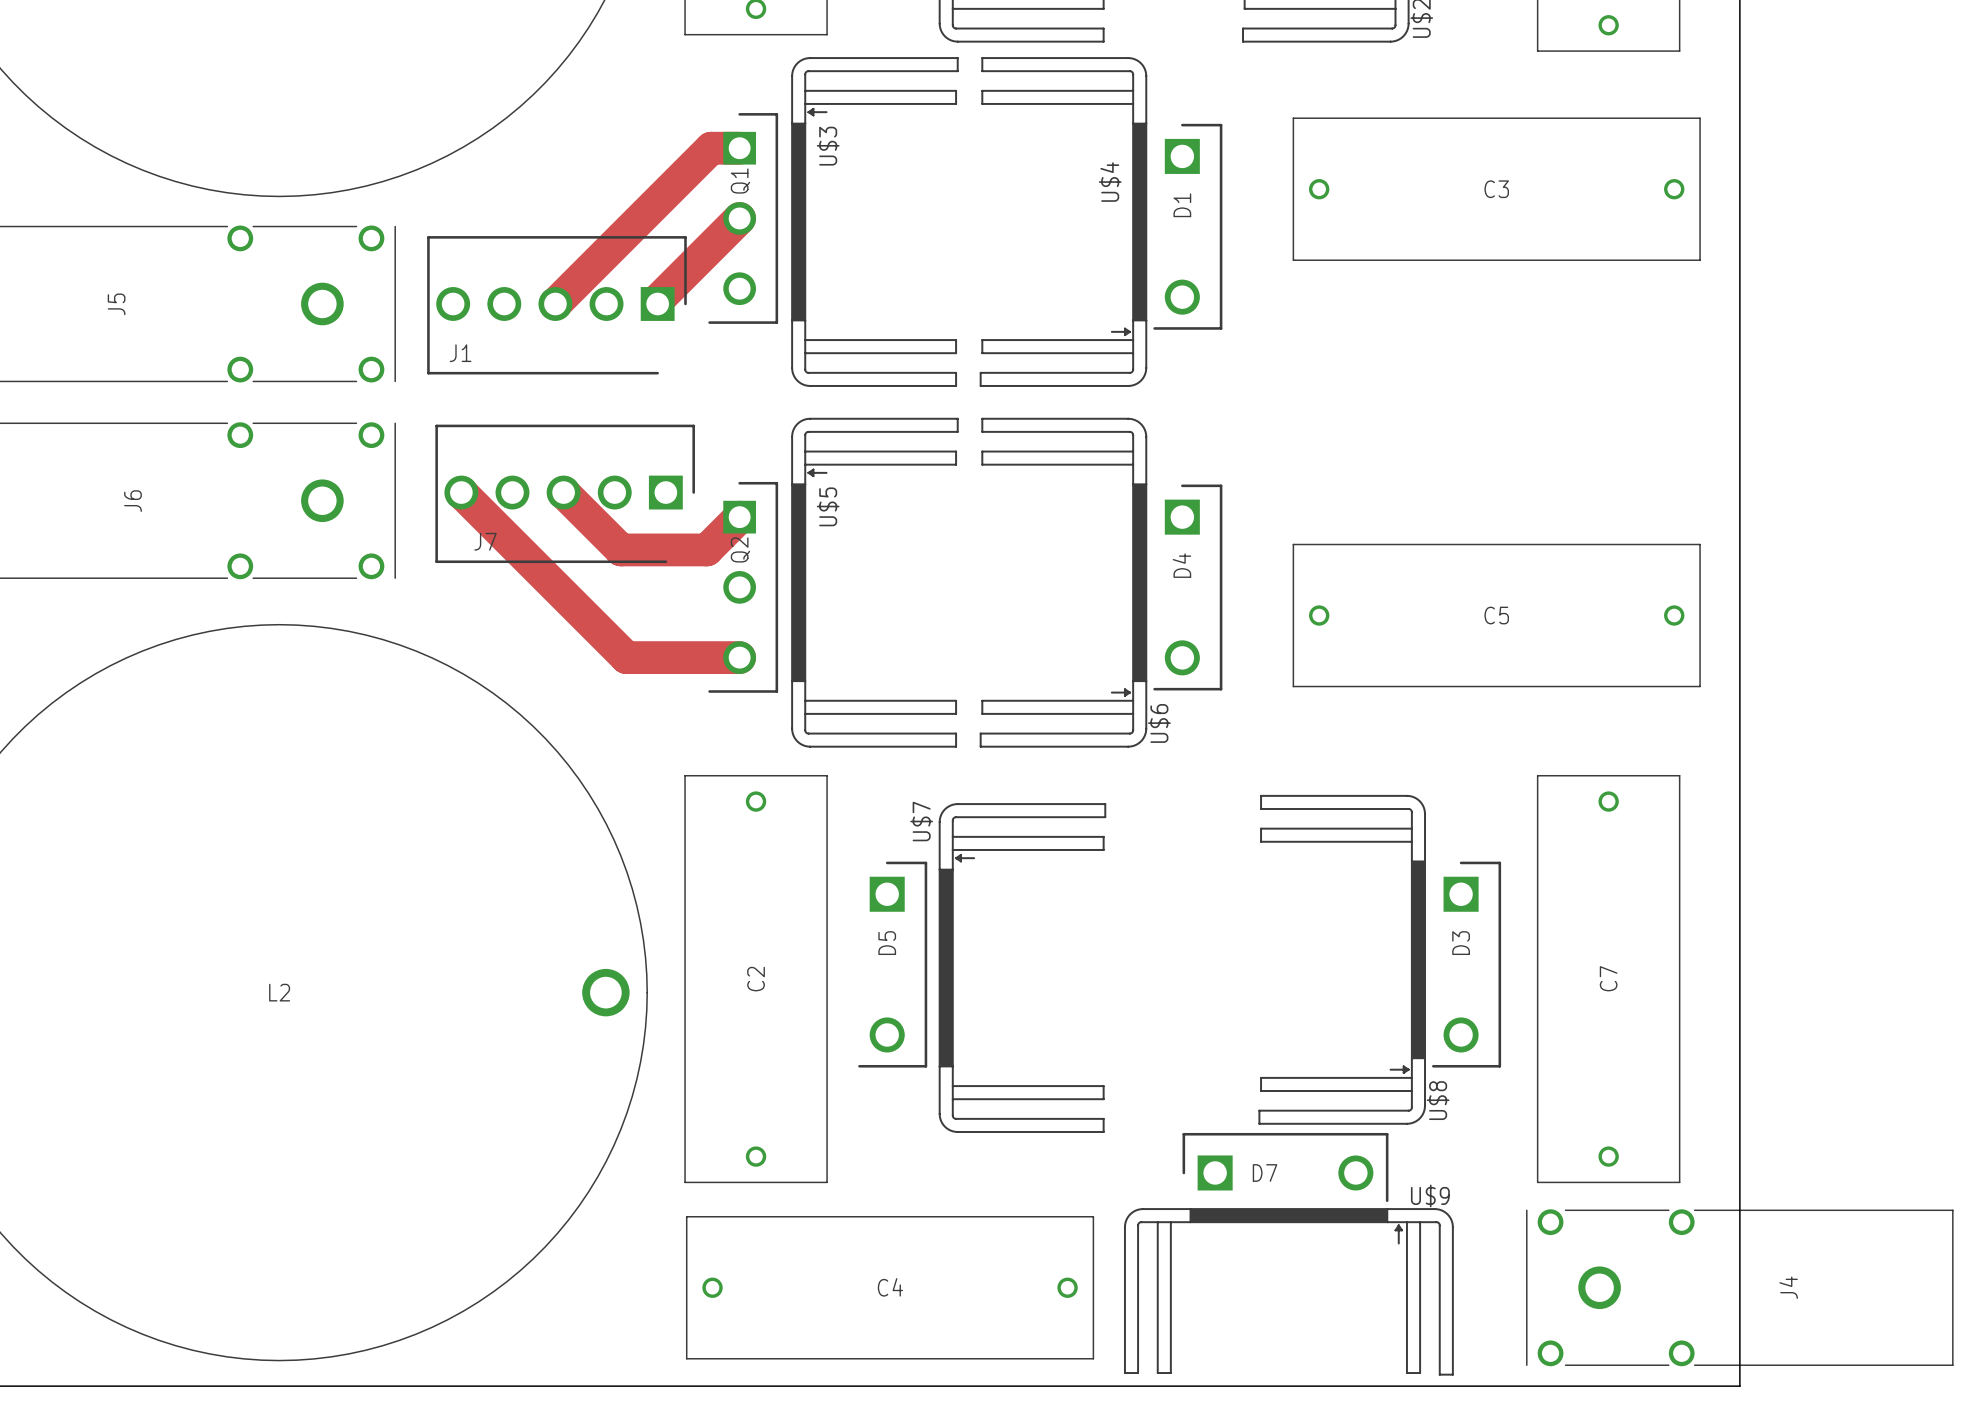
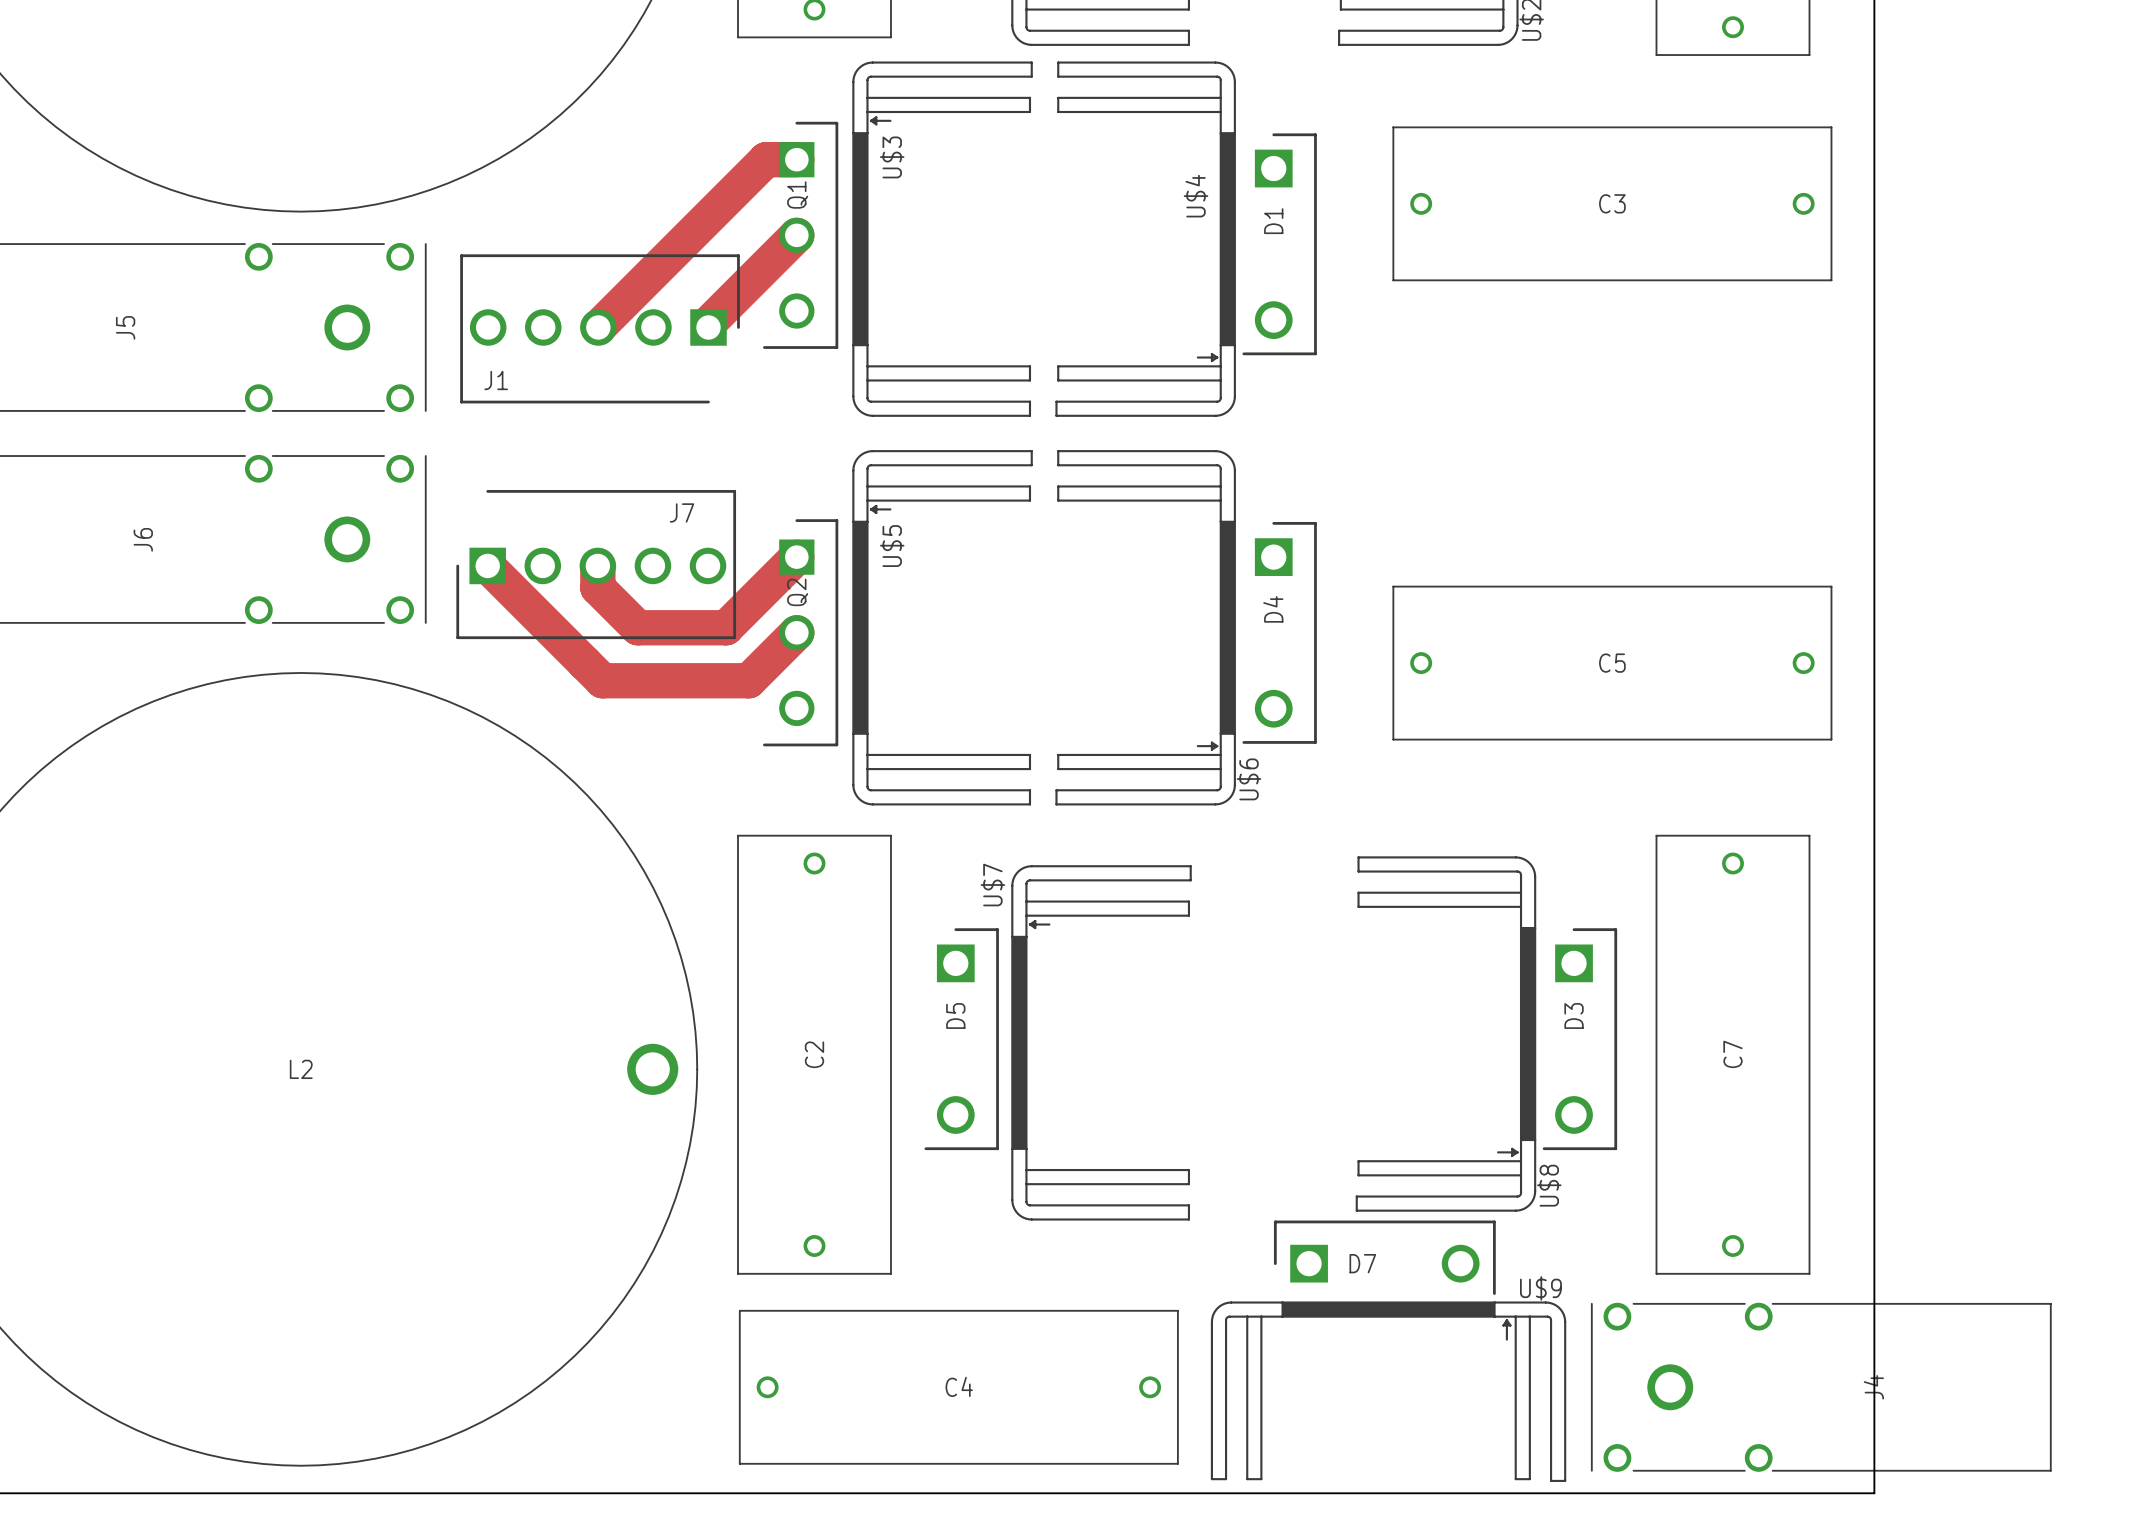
track: (461, 492) (626, 657) (739, 657) -> none
track: (563, 492) (621, 549) (706, 549) -> (597, 565) (597, 587) (637, 627) (726, 627) (761, 592)
J7 rotation: 0° (565, 493) -> 180° (596, 564)
track: none -> (487, 565) (602, 680) (748, 680) (796, 632)
J4 position: (1739, 1287) -> (1821, 1387)

